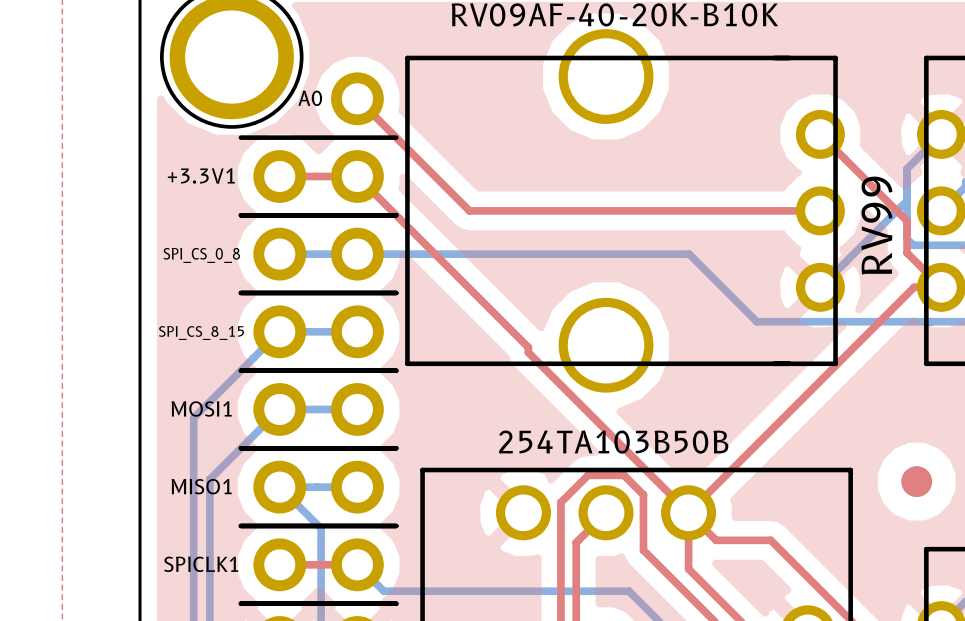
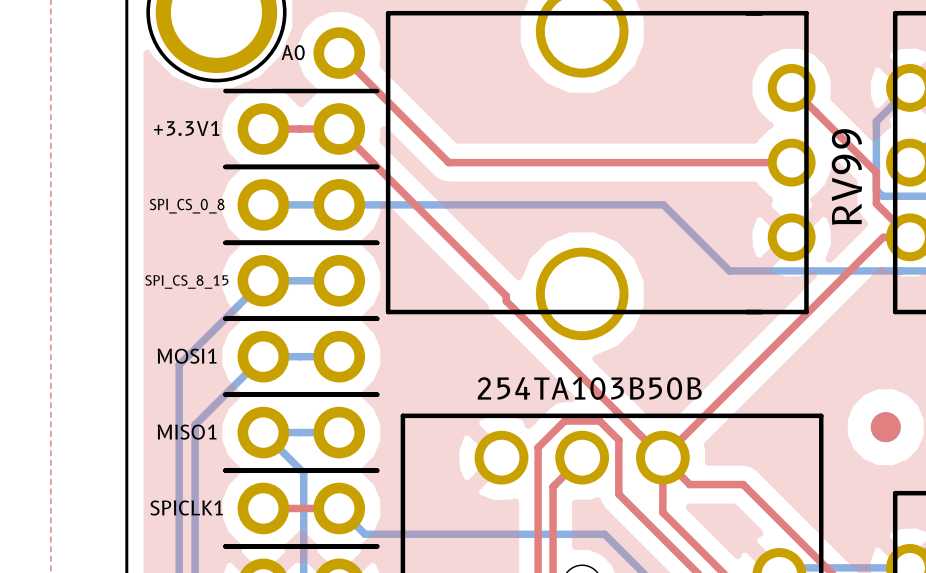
bottom track: (907, 200) (820, 287) -> none

